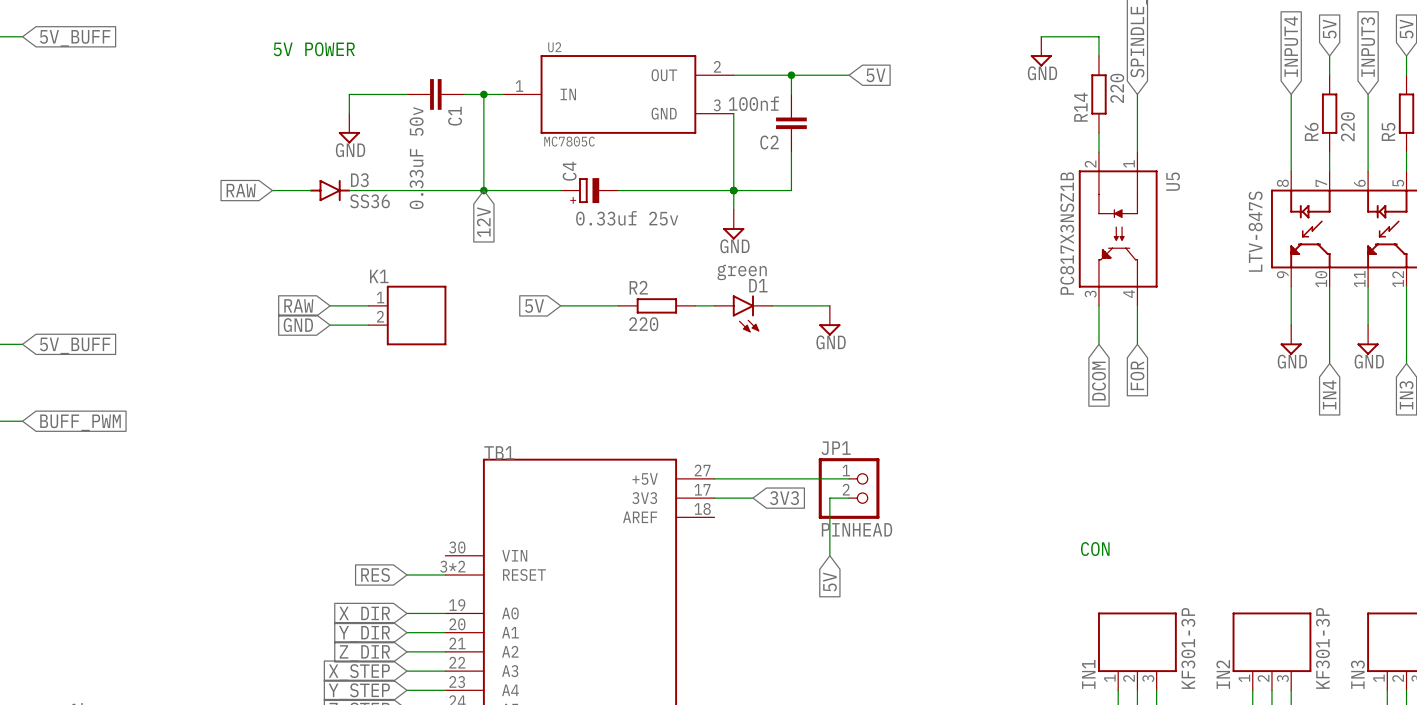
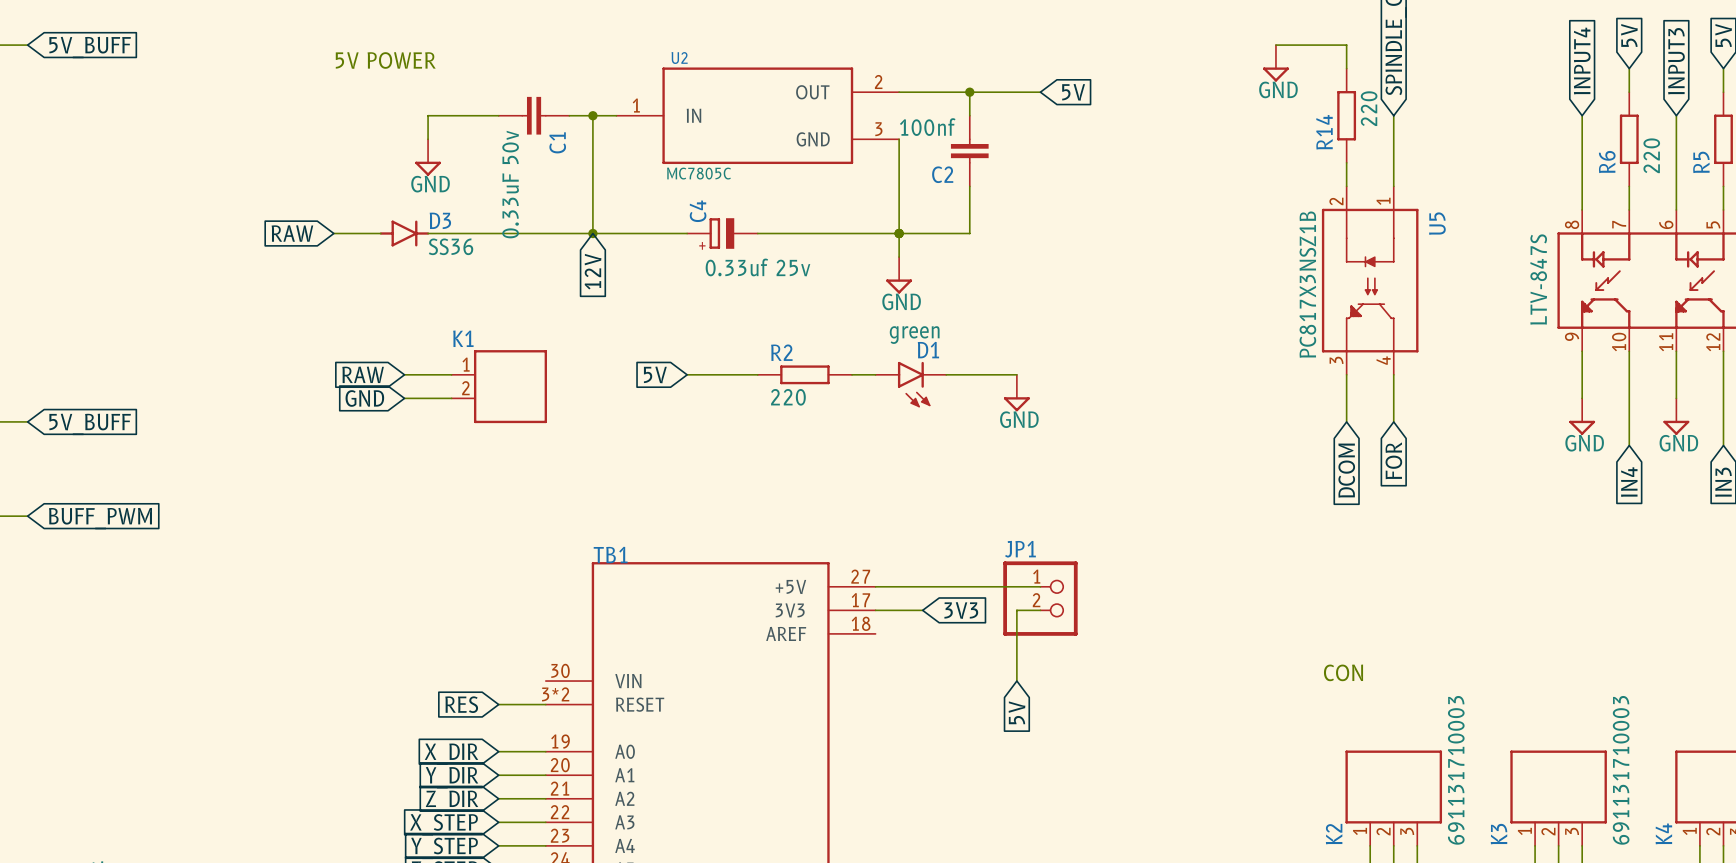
JP1 value: PINHEAD (856, 529) -> none
IN1 value: KF301-3P (1188, 648) -> 691131710003 (1456, 770)
IN2 value: KF301-3P (1322, 648) -> 691131710003 (1621, 770)
IN1 name: IN1 (1088, 674) -> K2 (1334, 834)
IN2 name: IN2 (1223, 674) -> K3 (1499, 834)
IN3 name: IN3 (1357, 674) -> K4 (1663, 833)

